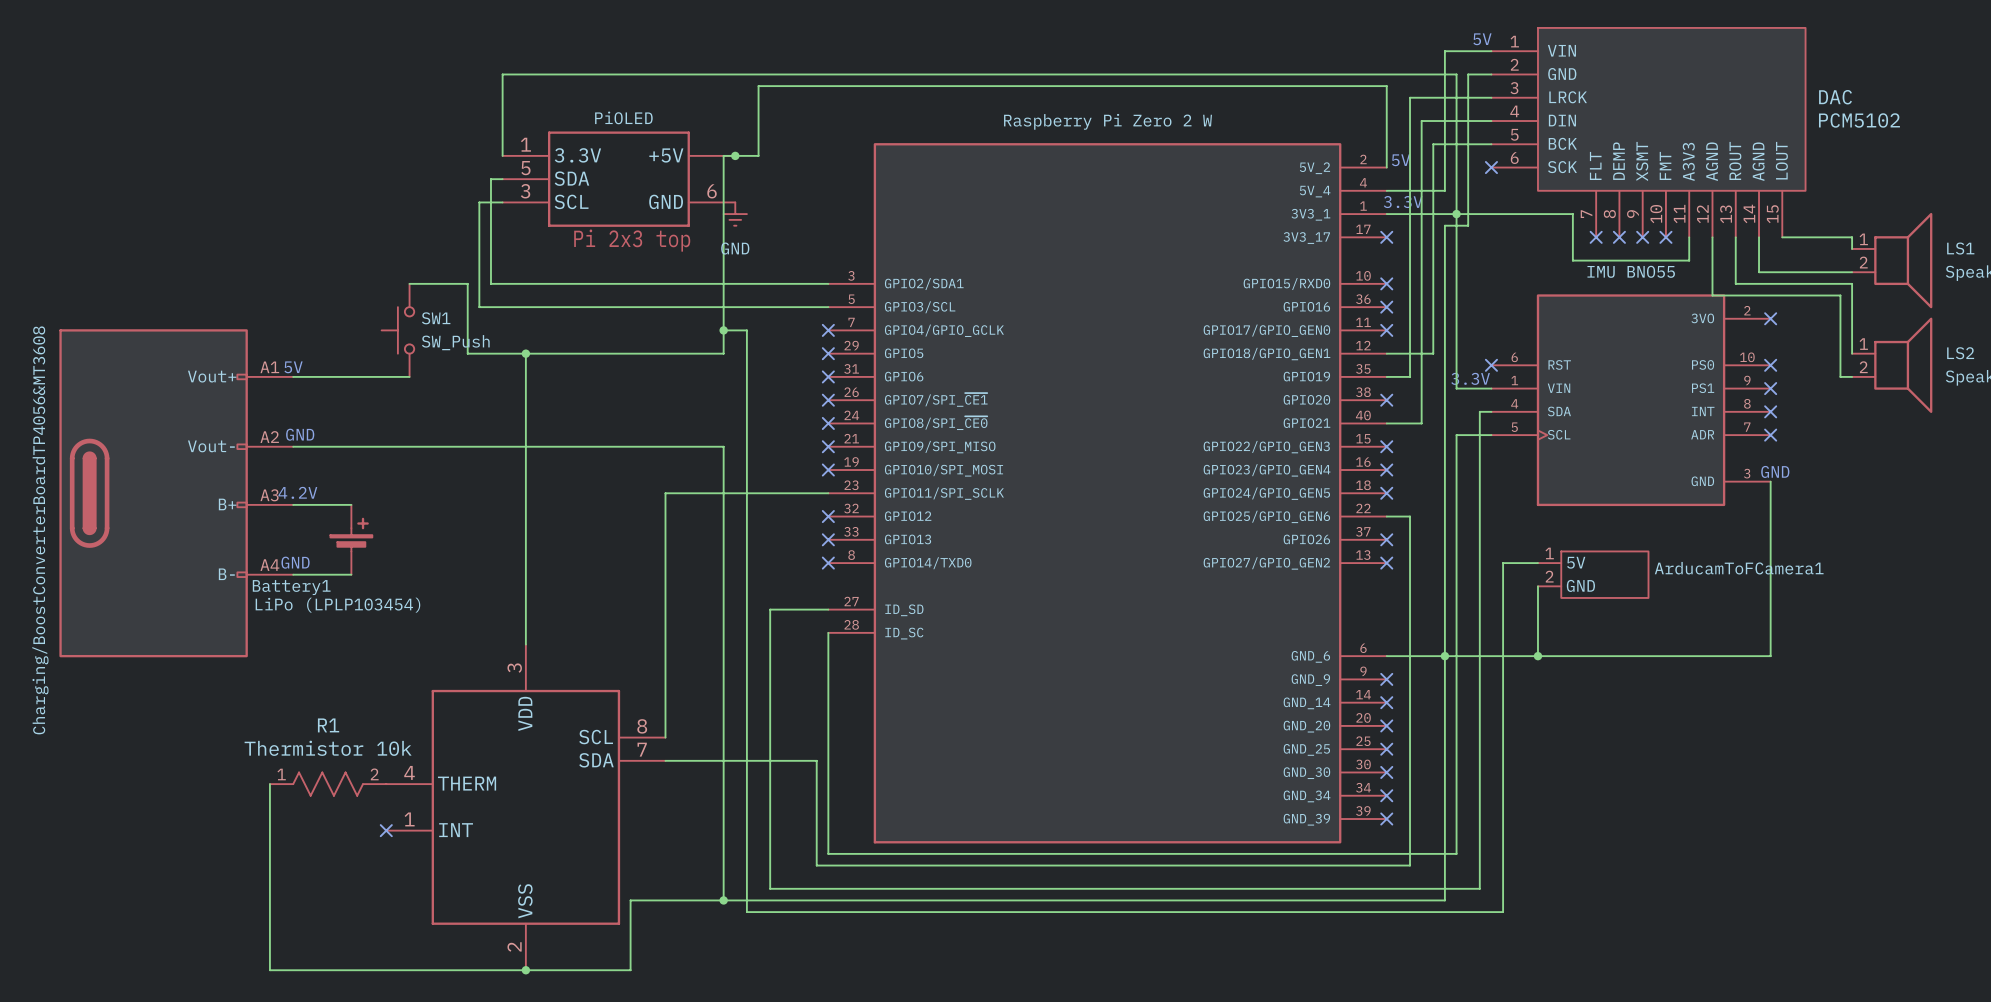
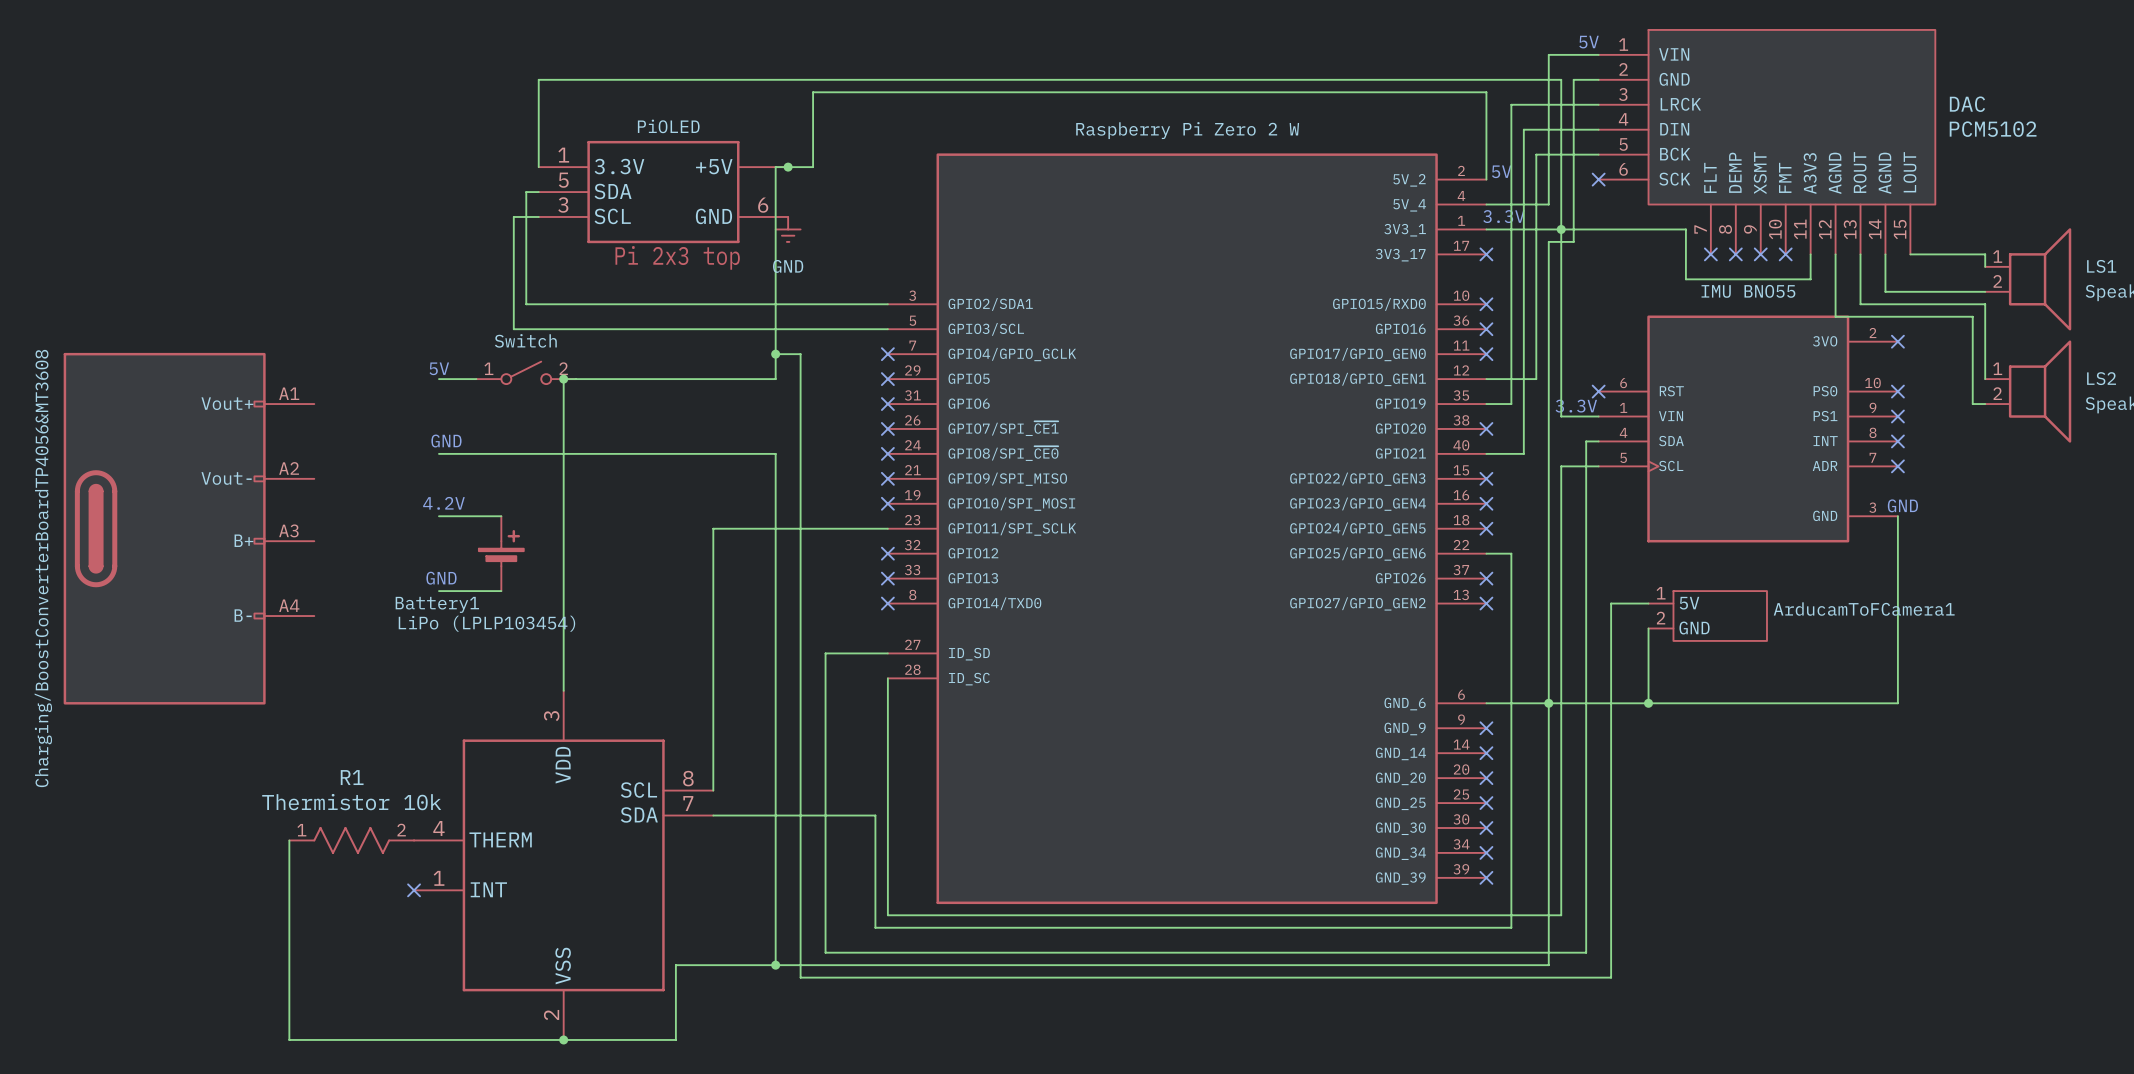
wire: (409, 283) (467, 283) (467, 353) (525, 353) -> none
SW1: SW_Push (397, 330) -> none
part: none -> Switch (526, 372)
wire: none -> (438, 379) (476, 379)
text position: 5V (293, 367) -> 5V (439, 368)
wire: (293, 376) (409, 376) -> none
text: none -> GND (446, 441)
text: GND (300, 434) -> none
wire: (293, 446) (723, 446) -> (438, 453) (775, 453) (775, 478)
text position: 4.2V (297, 492) -> 4.2V (443, 503)
wire: (293, 504) (351, 504) -> (438, 516) (501, 516)
Battery1 position: (351, 539) -> (501, 553)
text: none -> GND (441, 578)
text: GND (295, 562) -> none
wire: (293, 574) (351, 574) -> (438, 591) (501, 591)

